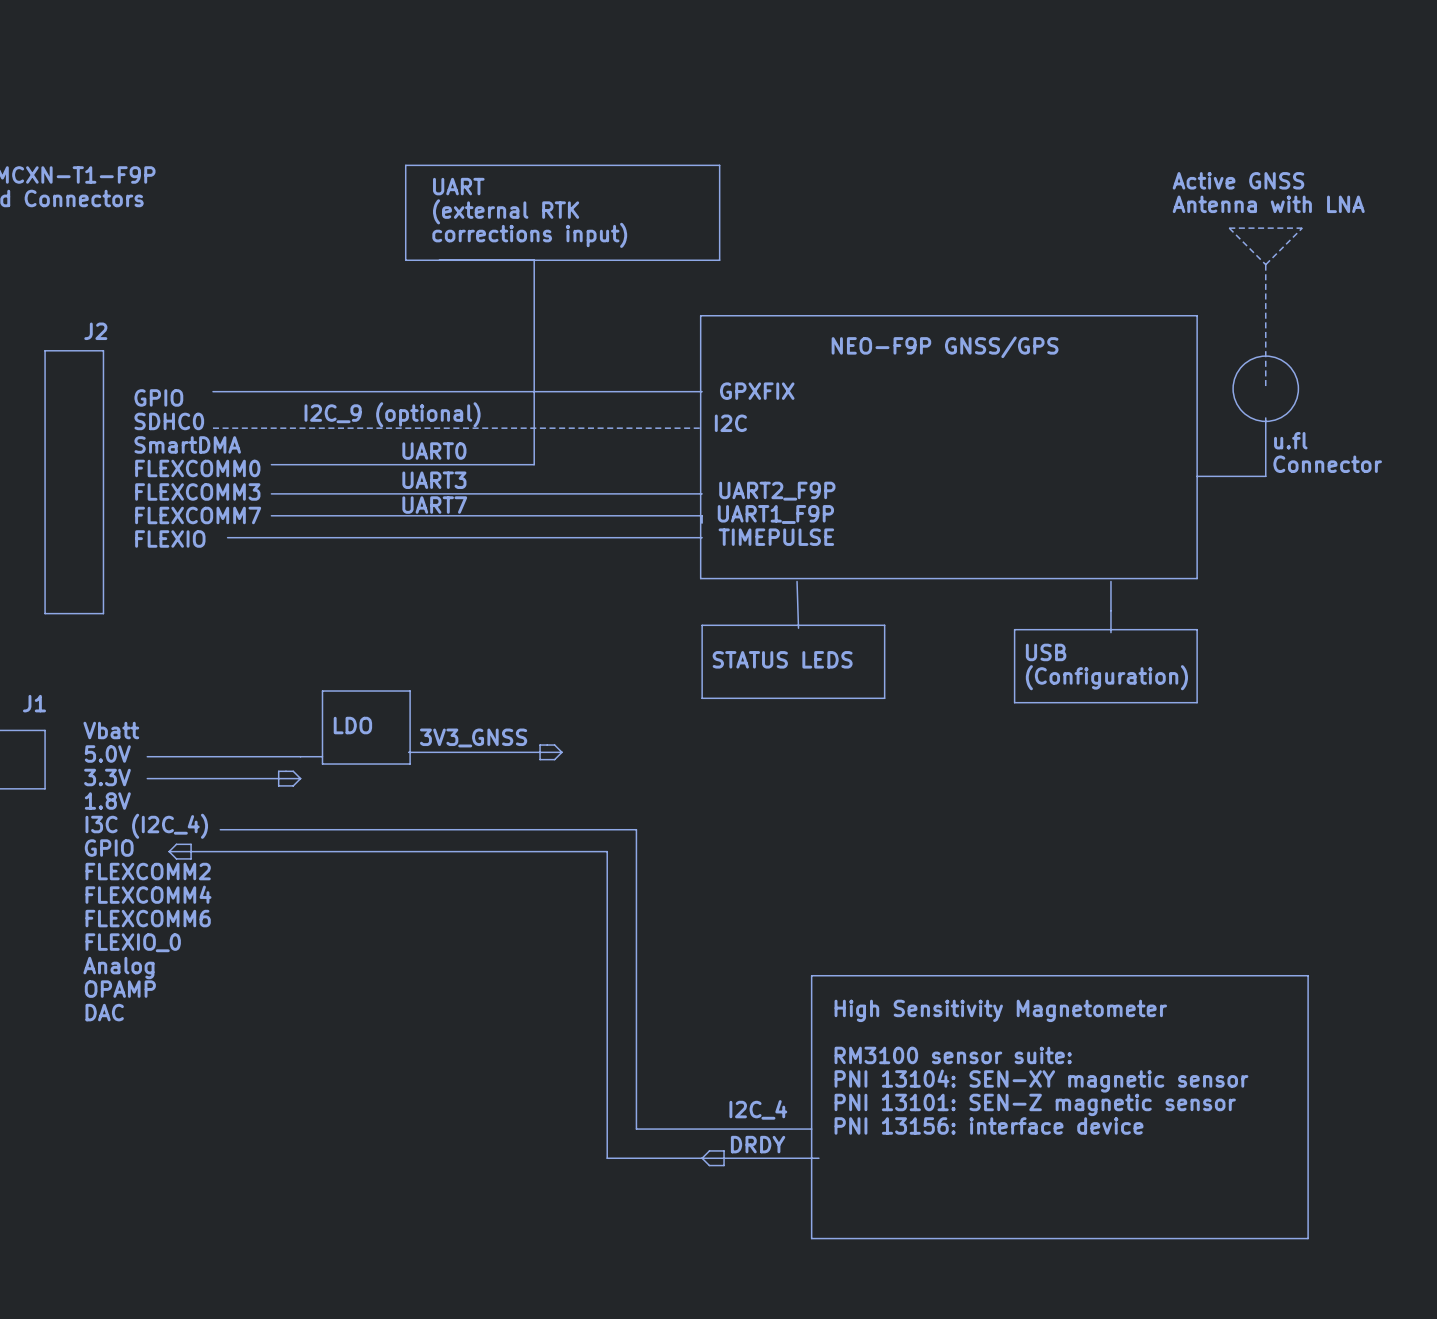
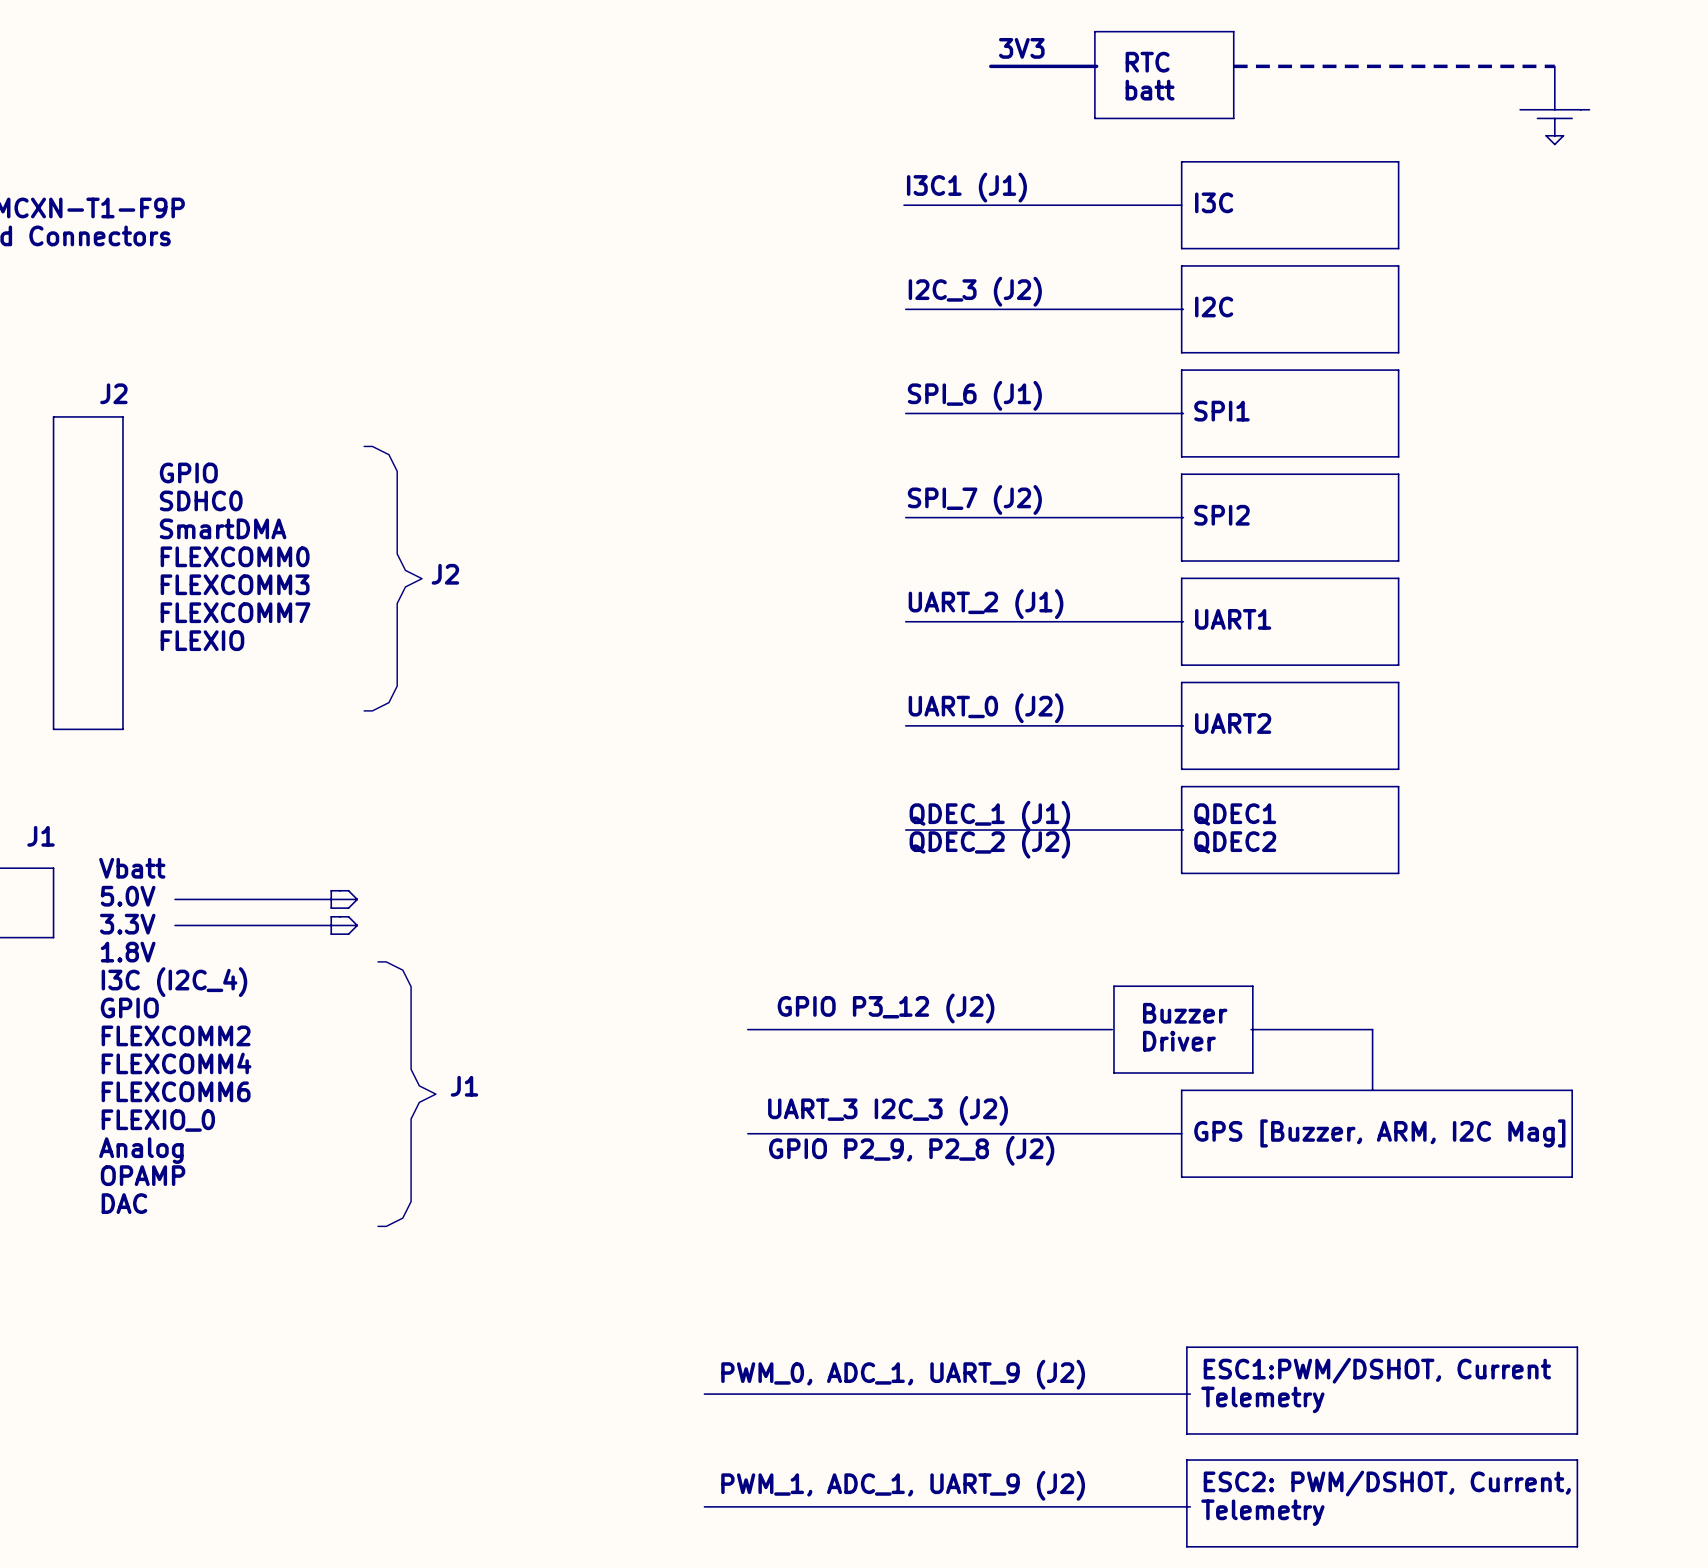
line: none -> (1094, 31) (1233, 31) (1233, 118) (1094, 118) (1094, 31)
text: none -> 3V3 (1021, 48)
text: none -> RTC (1147, 62)
line: none -> (990, 66) (1096, 66)
line: none -> (1233, 66) (1554, 66) (1554, 109)
text: none -> batt (1150, 90)
line: none -> (1520, 109) (1589, 109)
line: none -> (1537, 118) (1572, 118)
line: none -> (1554, 118) (1554, 135)
line: none -> (1546, 135) (1563, 135) (1554, 144) (1546, 135)
line: none -> (1181, 161) (1181, 248) (1398, 248) (1398, 161) (1181, 161)
text: none -> I3C1 (J1) (966, 187)
line: (405, 165) (719, 165) (719, 260) (405, 260) (405, 165) -> none
text: none -> I3C (1214, 202)
line: none -> (903, 205) (1181, 205)
text: Active GNSS (1238, 180) -> none
text: UART (458, 186) -> none
text: Antenna with LNA (1268, 204) -> none
text: (external RTK (506, 211) -> none
line: none -> (1181, 265) (1398, 265) (1398, 352) (1181, 352) (1181, 265)
text: corrections input) (529, 235) -> none
text: none -> I2C_3 (J2) (975, 291)
text: none -> I2C (1214, 306)
line: (534, 260) (534, 464) (271, 464) -> none
line: none -> (905, 309) (1183, 309)
line: (1265, 264) (1265, 388) -> none
line: (1265, 264) (1302, 228) (1229, 228) (1265, 264) -> none
line: none -> (1181, 370) (1181, 456) (1398, 456) (1398, 370) (1181, 370)
line: (700, 315) (1197, 315) (1197, 578) (700, 578) (700, 315) -> none
text: none -> SPI_6 (J1) (974, 395)
text: none -> SPI1 (1221, 411)
line: none -> (905, 413) (1183, 413)
text: NEO-F9P GNSS/GPS (945, 347) -> none
drawing: [1233, 356, 1299, 422] -> none
line: (212, 391) (702, 391) -> none
text: GPXFIX (757, 391) -> none
line: none -> (1181, 474) (1181, 561) (1398, 561) (1398, 474) (1181, 474)
text: I2C_9 (optional) (392, 414) -> none
line: (1265, 417) (1265, 476) (1197, 476) -> none
text: none -> SPI_7 (J2) (974, 499)
text: I2C (730, 423) -> none
line: (212, 428) (702, 428) -> none
text: none -> SPI2 (1221, 515)
line: none -> (905, 517) (1183, 517)
text: u.fl (1290, 440) -> none
text: UART0 (434, 451) -> none
text: Connector (1327, 464) -> none
text: UART3 (434, 480) -> none
text: none -> J2 (445, 574)
text: none -> } (393, 578)
line: none -> (1181, 578) (1181, 665) (1398, 665) (1398, 578) (1181, 578)
text: UART2_F9P (777, 491) -> none
line: (271, 493) (702, 493) -> none
text: UART7 (434, 505) -> none
text: none -> UART_2 (J1) (986, 604)
text: UART1_F9P (775, 514) -> none
line: (271, 515) (702, 515) (702, 523) -> none
text: none -> UART1 (1233, 619)
line: none -> (905, 621) (1183, 621)
line: (227, 537) (702, 537) -> none
text: TIMEPULSE (776, 537) -> none
line: none -> (1181, 682) (1181, 769) (1398, 769) (1398, 682) (1181, 682)
line: (797, 581) (798, 628) -> none
line: (1110, 581) (1110, 632) -> none
text: none -> UART_0 (J2) (986, 708)
text: none -> UART2 (1233, 723)
line: none -> (905, 725) (1183, 725)
line: (1014, 629) (1197, 629) (1197, 702) (1014, 702) (1014, 629) -> (1181, 786) (1398, 786) (1398, 873) (1181, 873) (1181, 786)
text: USB (1046, 652) -> none
text: STATUS LEDS (782, 659) -> none
text: (Configuration) (1106, 677) -> none
text: none -> QDEC1 (1235, 814)
text: none -> QDEC_1 (J1) (989, 815)
line: (322, 691) (410, 691) (410, 764) (322, 764) (322, 691) -> none
line: (762, 698) (702, 698) (702, 625) (884, 625) (884, 698) -> (1183, 830) (1051, 830)
text: none -> QDEC2 (1235, 842)
text: none -> QDEC_2 (J2) (989, 843)
text: LDO (352, 725) -> none
text: 3V3_GNSS (473, 737) -> none
line: none -> (331, 890) (331, 908) (348, 908) (357, 899) (348, 890) (331, 890)
line: (408, 752) (561, 752) -> none
line: (561, 752) (554, 745) (540, 745) (540, 759) (554, 759) (561, 752) -> none
line: (300, 756) (322, 756) -> none
line: (220, 829) (636, 829) (636, 1129) (811, 1129) -> none
line: none -> (1113, 986) (1252, 986) (1252, 1072) (1113, 1072) (1113, 986)
text: none -> GPIO P3_12 (J2) (886, 1008)
line: (169, 851) (176, 844) (191, 844) (191, 858) (176, 858) (169, 851) -> none
line: (169, 851) (607, 851) (607, 1158) (818, 1158) -> none
text: none -> Buzzer (1185, 1013)
line: none -> (747, 1029) (1112, 1029)
line: none -> (1251, 1029) (1372, 1029) (1372, 1090)
text: none -> Driver (1179, 1041)
text: none -> J1 (464, 1086)
line: none -> (1181, 1090) (1181, 1177) (1572, 1177) (1572, 1090) (1181, 1090)
text: none -> } (406, 1094)
text: none -> UART_3 I2C_3 (J2) (888, 1110)
line: none -> (747, 1133) (1181, 1133)
text: none -> GPS [Buzzer, ARM, I2C Mag] (1379, 1133)
text: none -> GPIO P2_9, P2_8 (J2) (911, 1150)
line: (811, 975) (1308, 975) (1308, 1238) (811, 1238) (811, 975) -> none
text: High Sensitivity Magnetometer (1000, 1010) -> none
text: RM3100 sensor suite: (953, 1055) -> none
text: PNI 13104: SEN-XY magnetic sensor (1041, 1081) -> none
text: PNI 13101: SEN-Z magnetic sensor (1035, 1104) -> none
text: I2C_4 (758, 1109) -> none
text: PNI 13156: interface device (988, 1125) -> none
line: none -> (1186, 1347) (1577, 1347) (1577, 1433) (1186, 1433) (1186, 1347)
text: DRDY (758, 1144) -> none
line: (709, 1150) (702, 1158) (709, 1165) (724, 1165) (724, 1150) (709, 1150) -> none
text: none -> ESC1:PWM/DSHOT, Current (1377, 1370)
text: none -> PWM_0, ADC_1, UART_9 (J2) (903, 1374)
line: none -> (704, 1394) (1190, 1394)
text: none -> Telemetry (1262, 1399)
line: none -> (1186, 1460) (1186, 1546) (1577, 1546) (1577, 1460) (1186, 1460)
text: none -> ESC2: PWM/DSHOT, Current, (1387, 1483)
text: none -> PWM_1, ADC_1, UART_9 (J2) (903, 1485)
line: none -> (704, 1506) (1190, 1506)
text: none -> Telemetry (1262, 1512)

